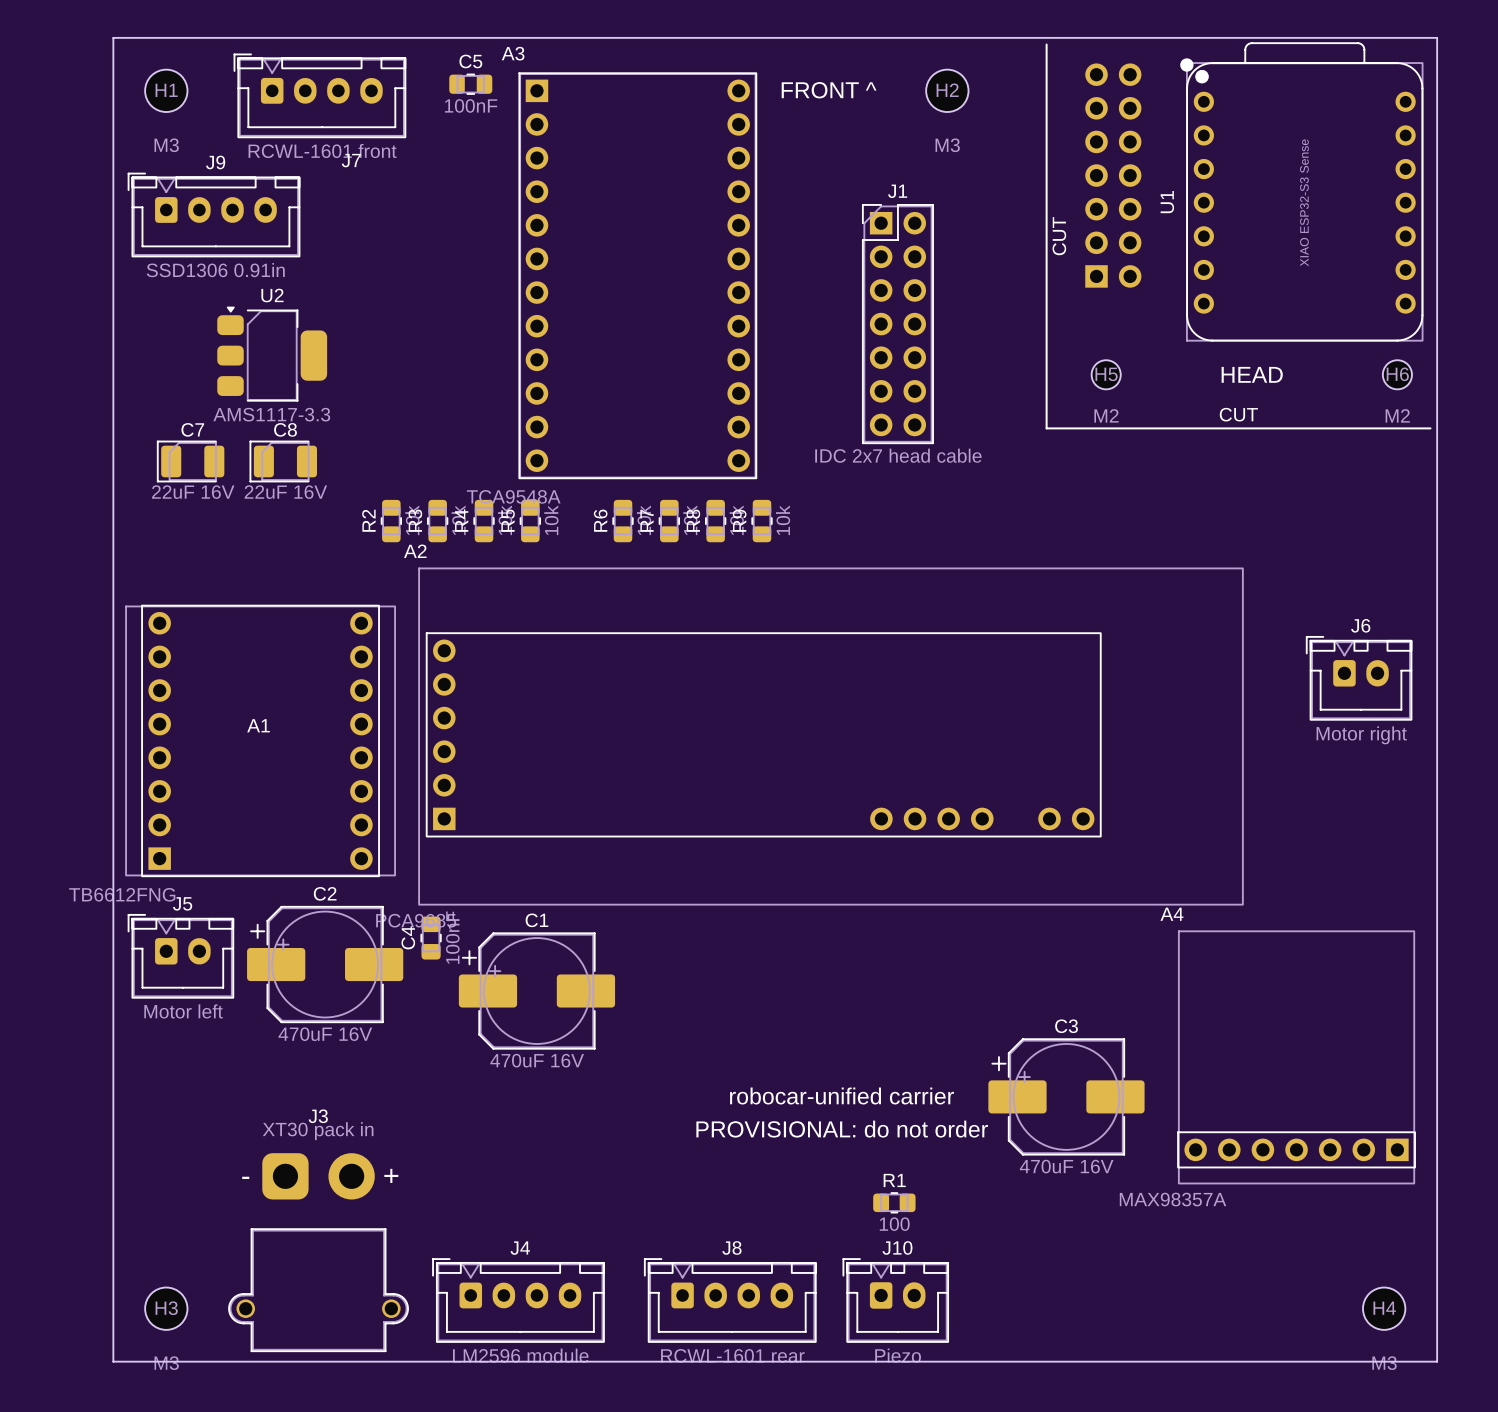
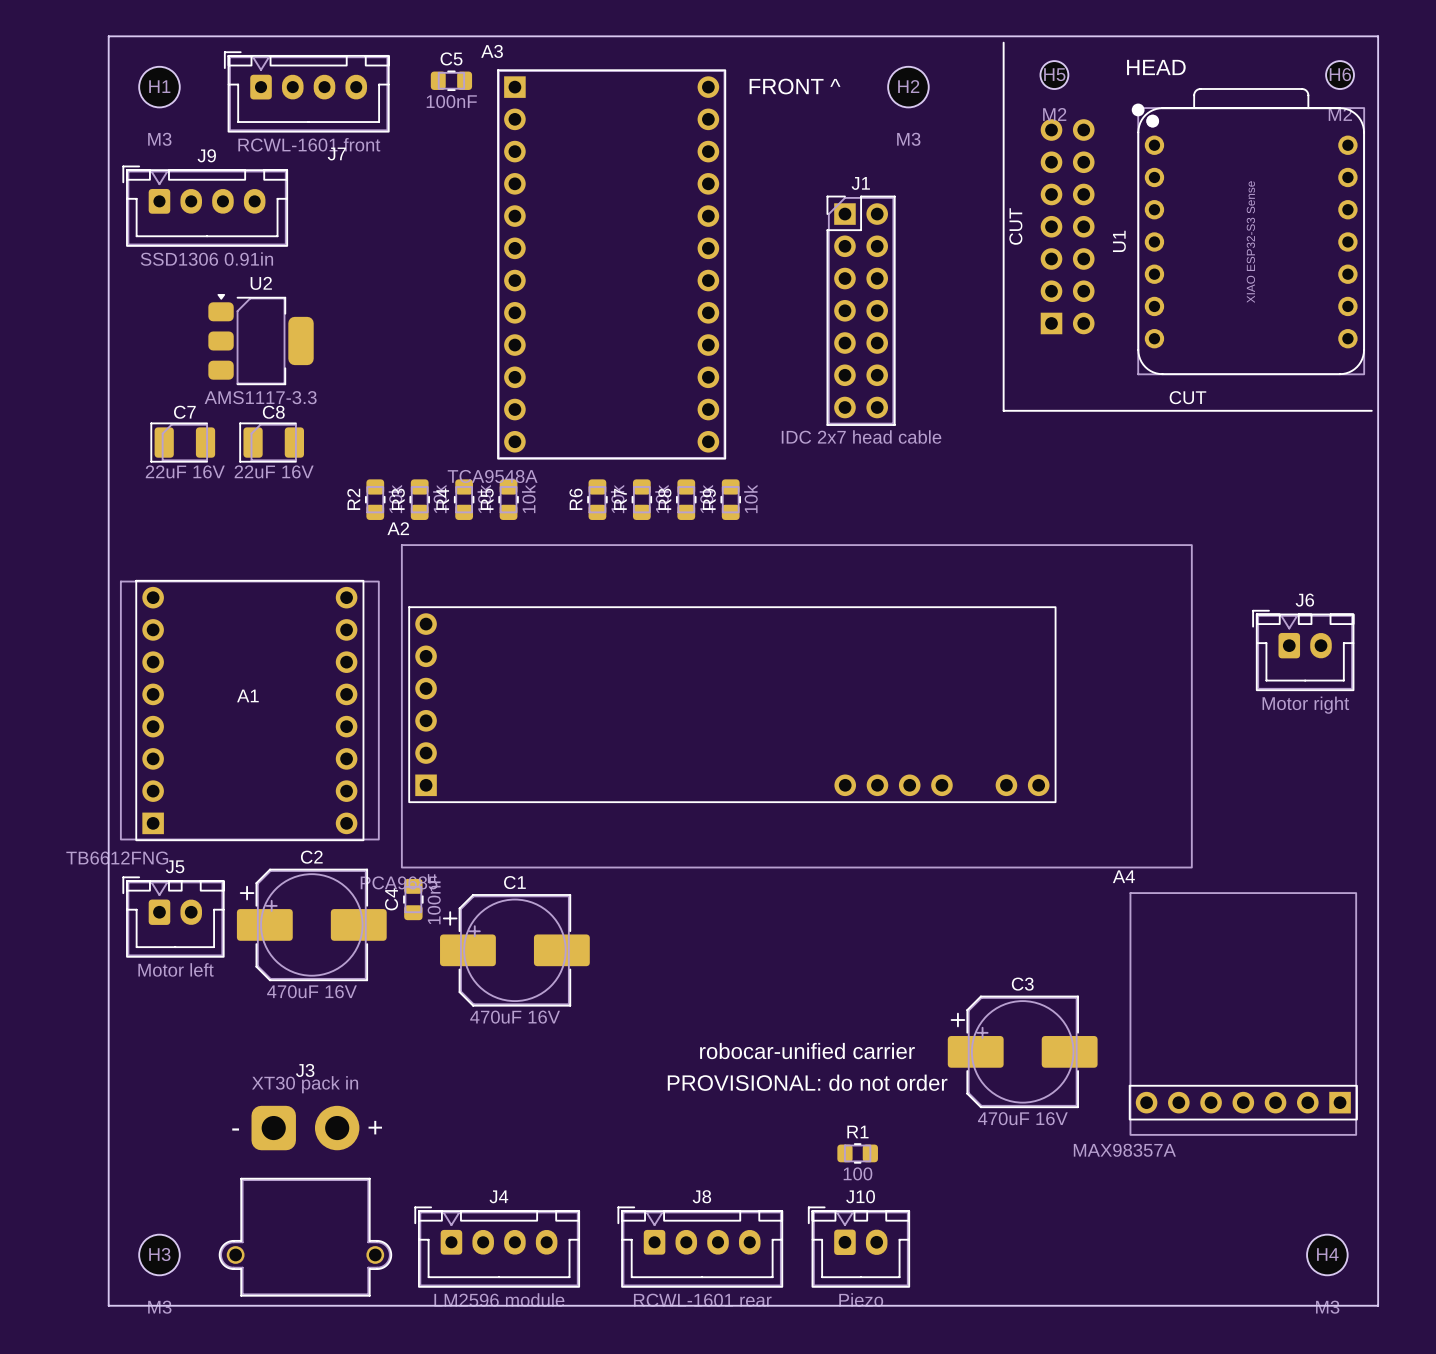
part position: (1113, 175) -> (1067, 226)
U1 position: (1301, 191) -> (1248, 231)
H5 position: (1106, 374) -> (1054, 75)
text position: HEAD (1252, 374) -> HEAD (1156, 67)
H6 position: (1397, 374) -> (1340, 75)

